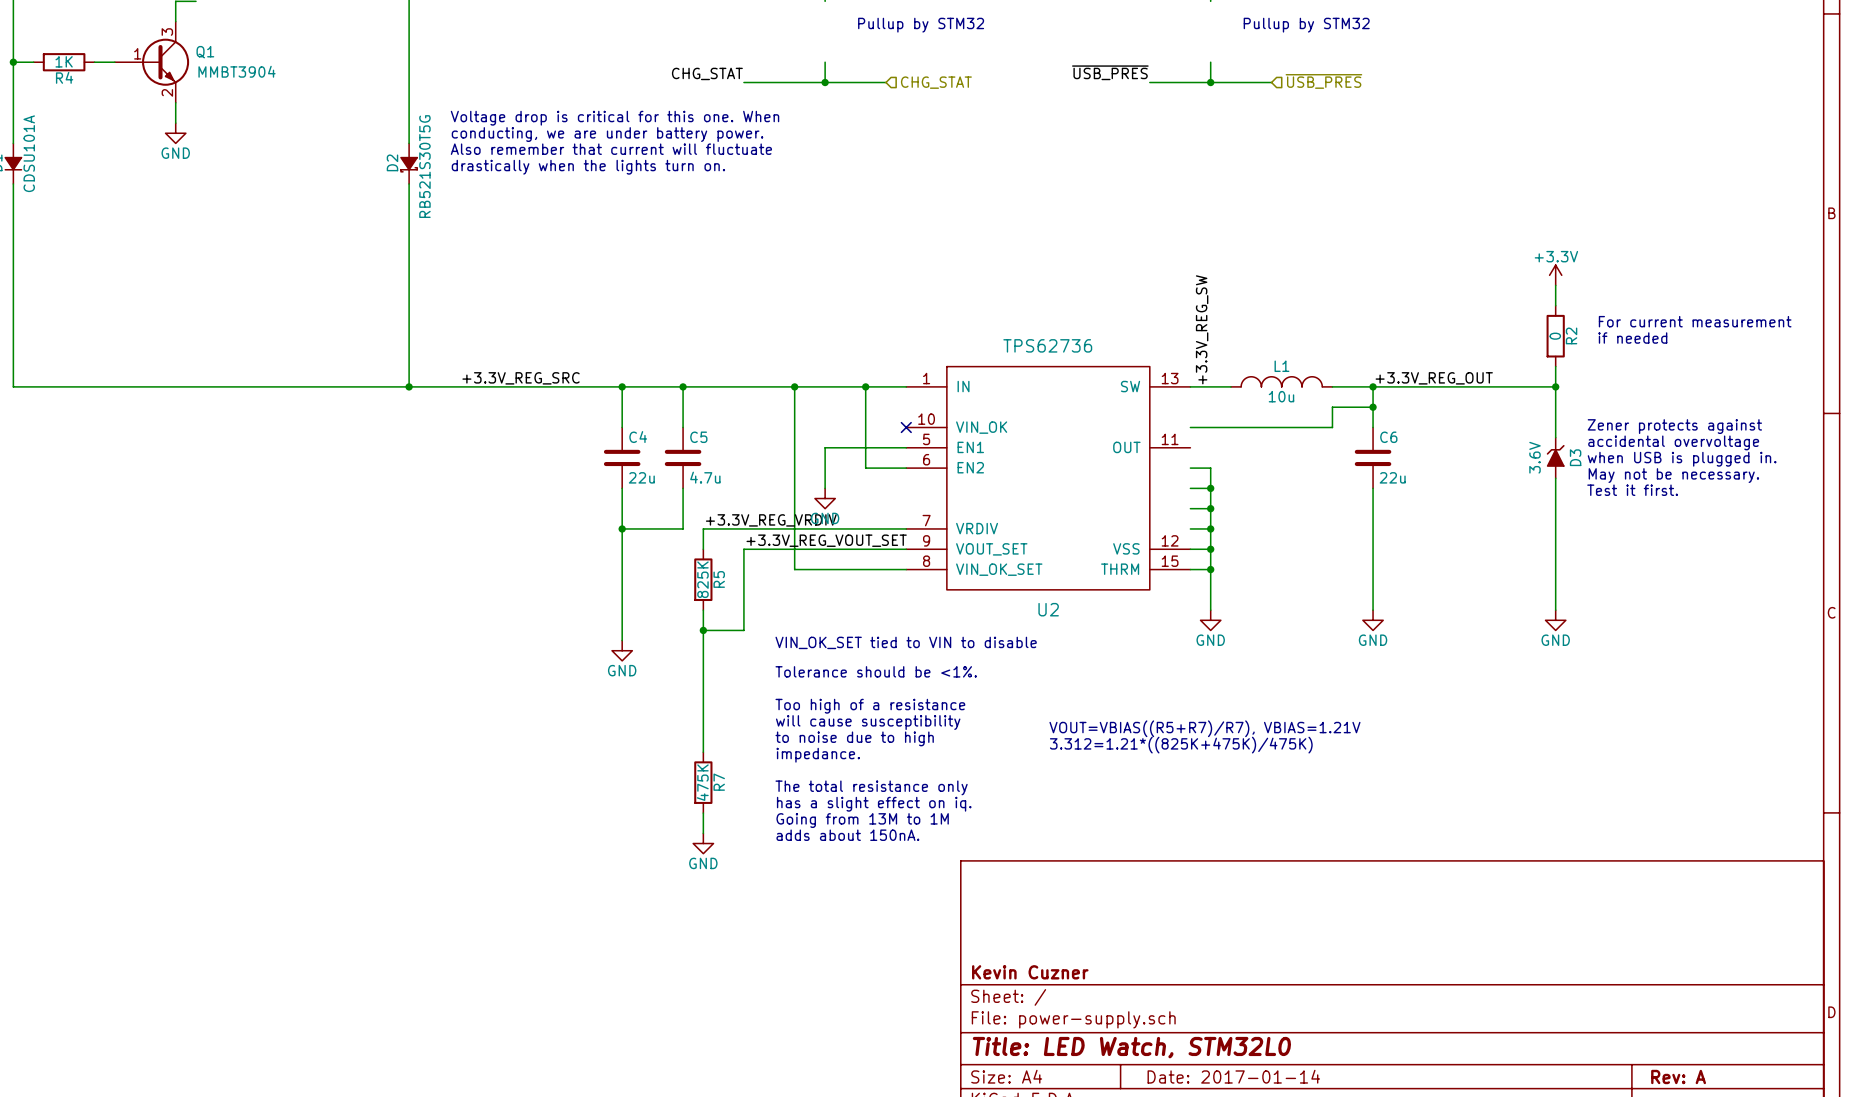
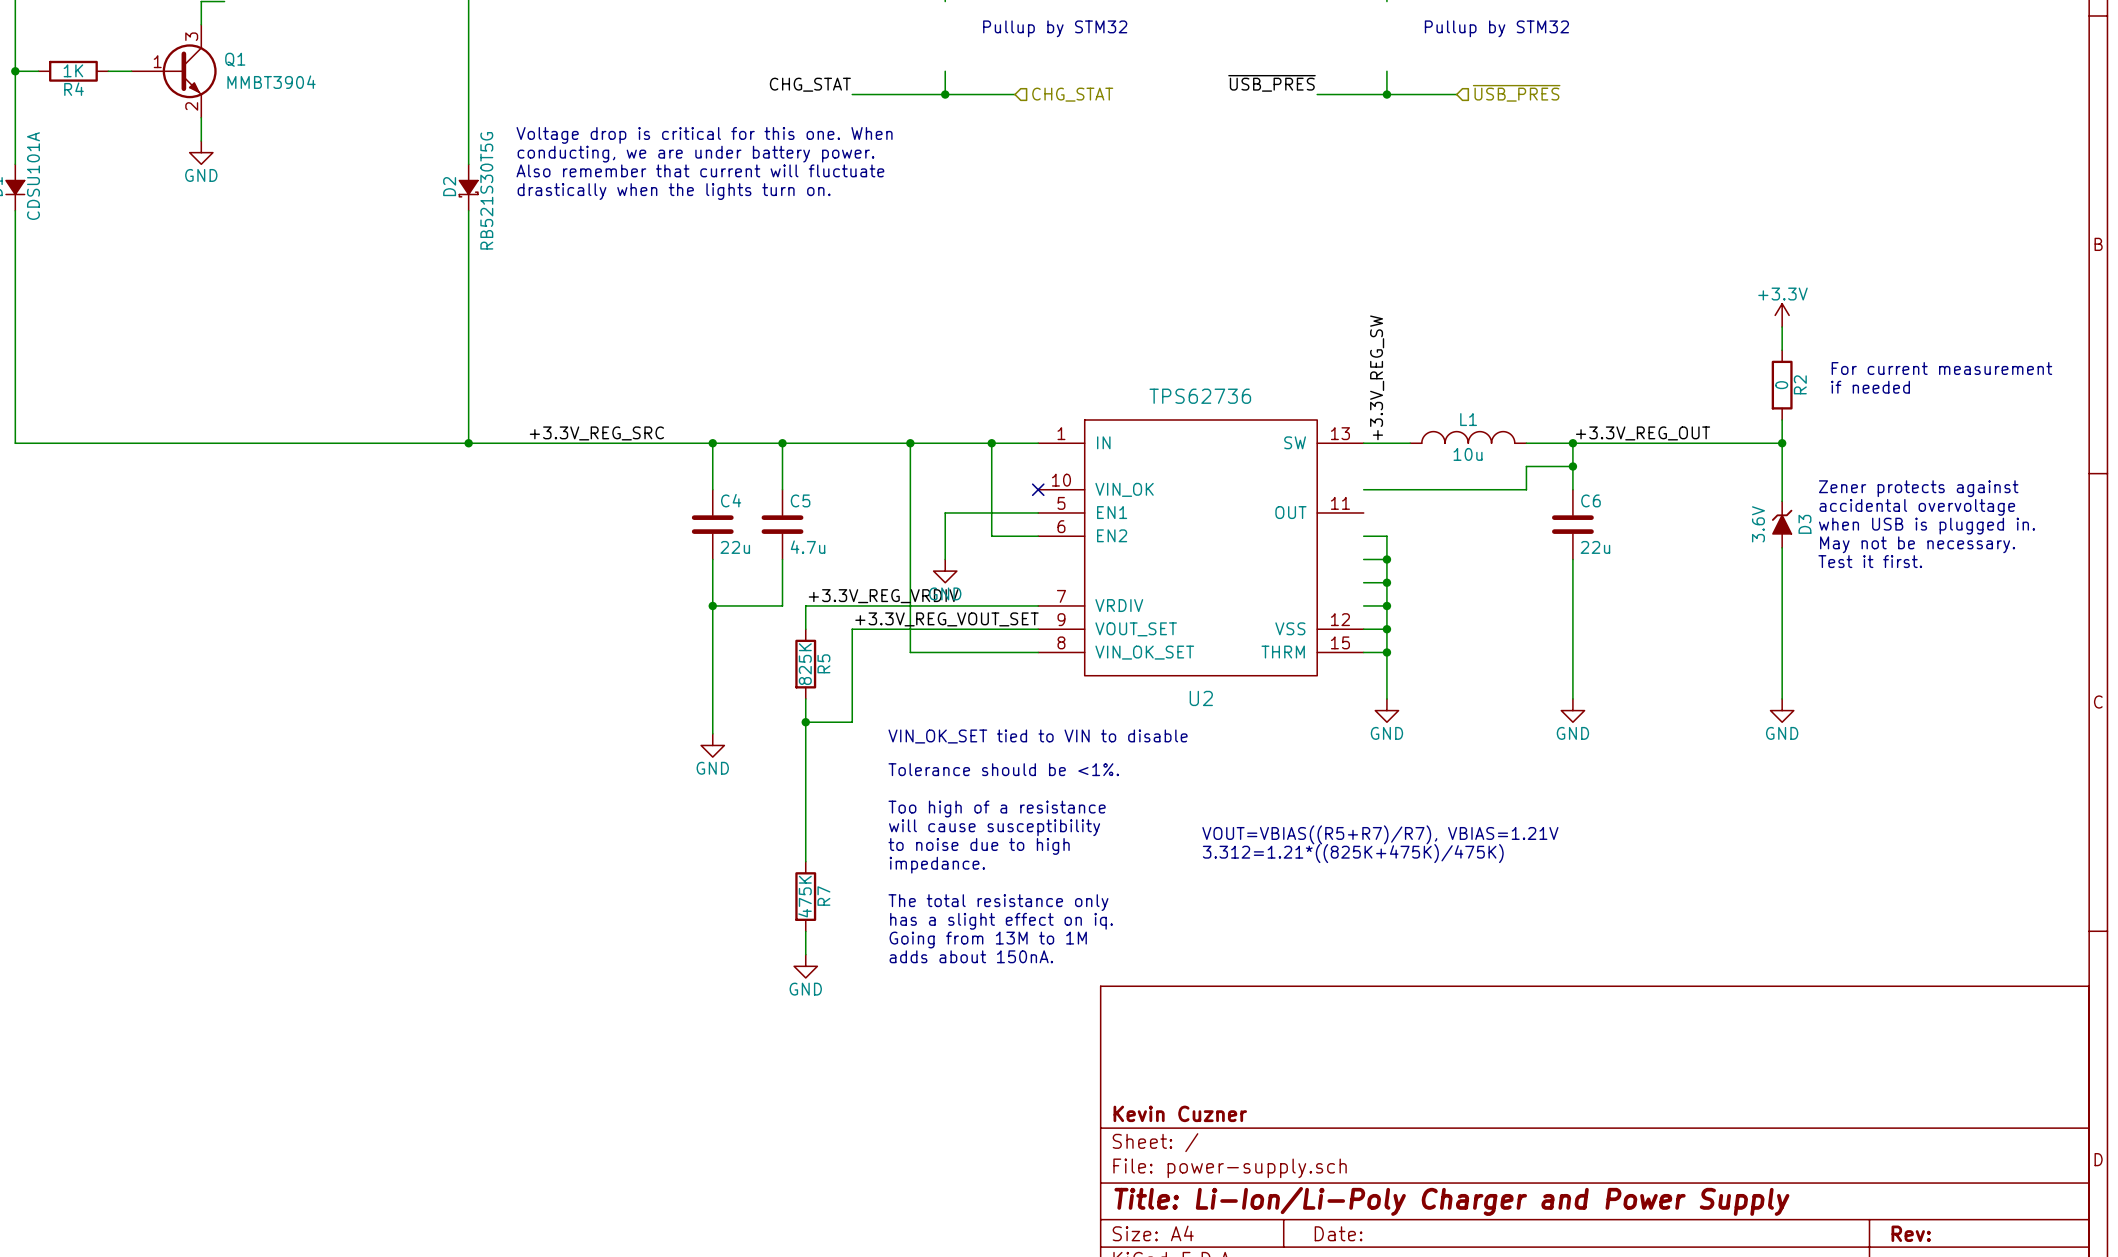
title block: Title: LED Watch, STM32L0 (1131, 1047) -> Title: Li-Ion/Li-Poly Charger and Power Supply (1451, 1201)
title block: Date: 2017-01-14 (1233, 1076) -> Date: (1338, 1233)
title block: Rev: A (1678, 1076) -> Rev: (1911, 1233)

